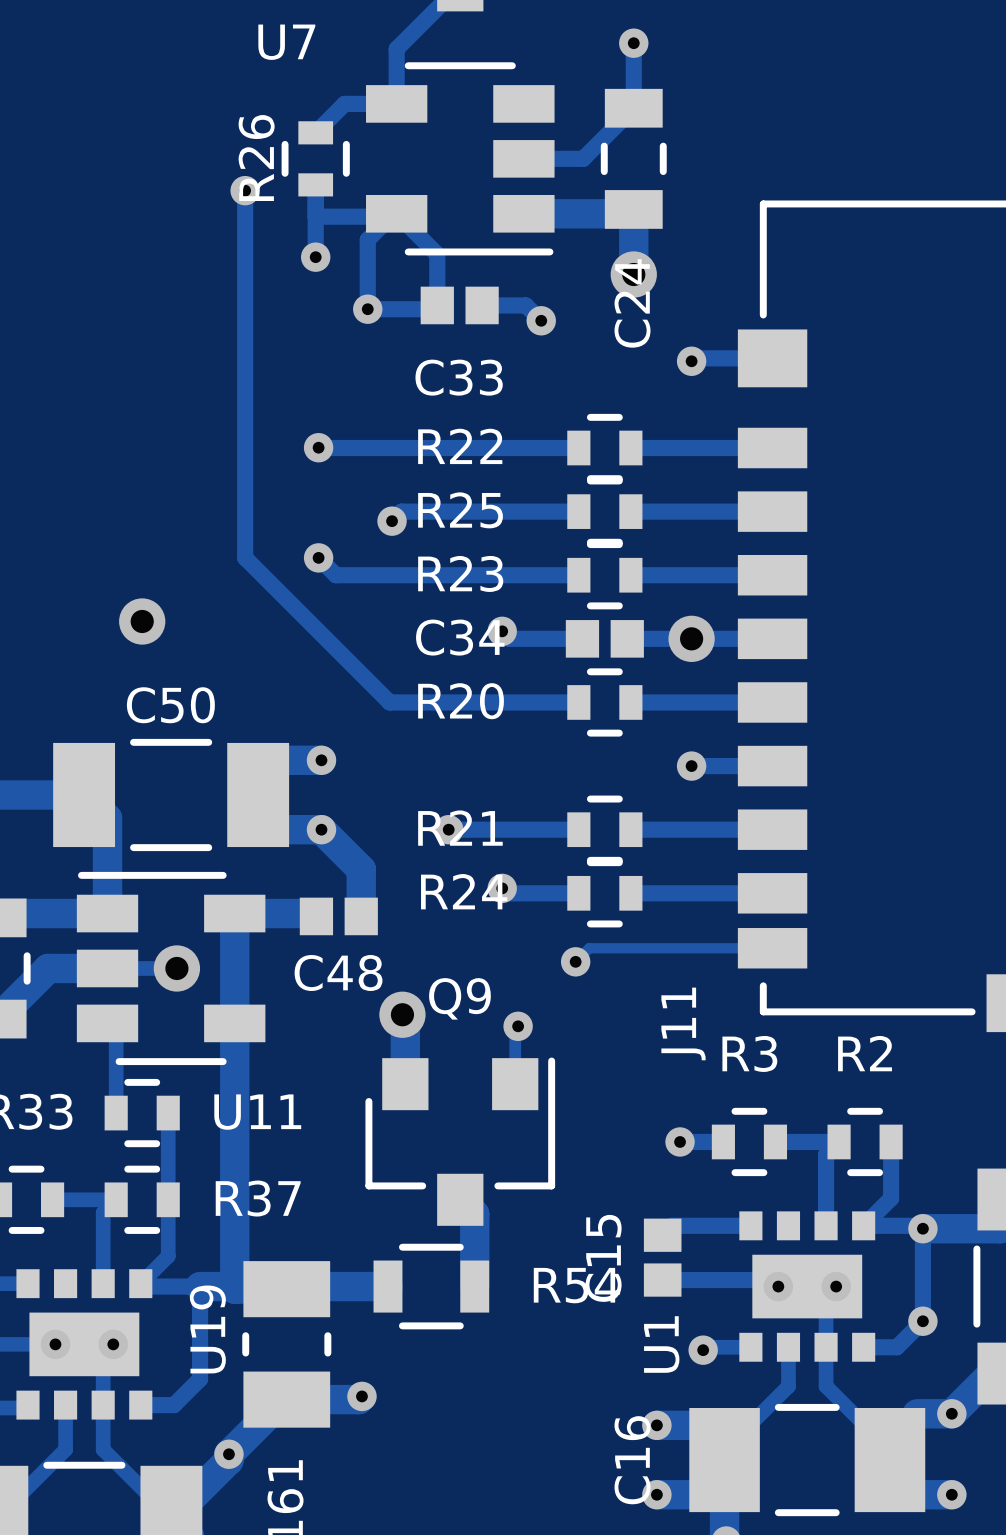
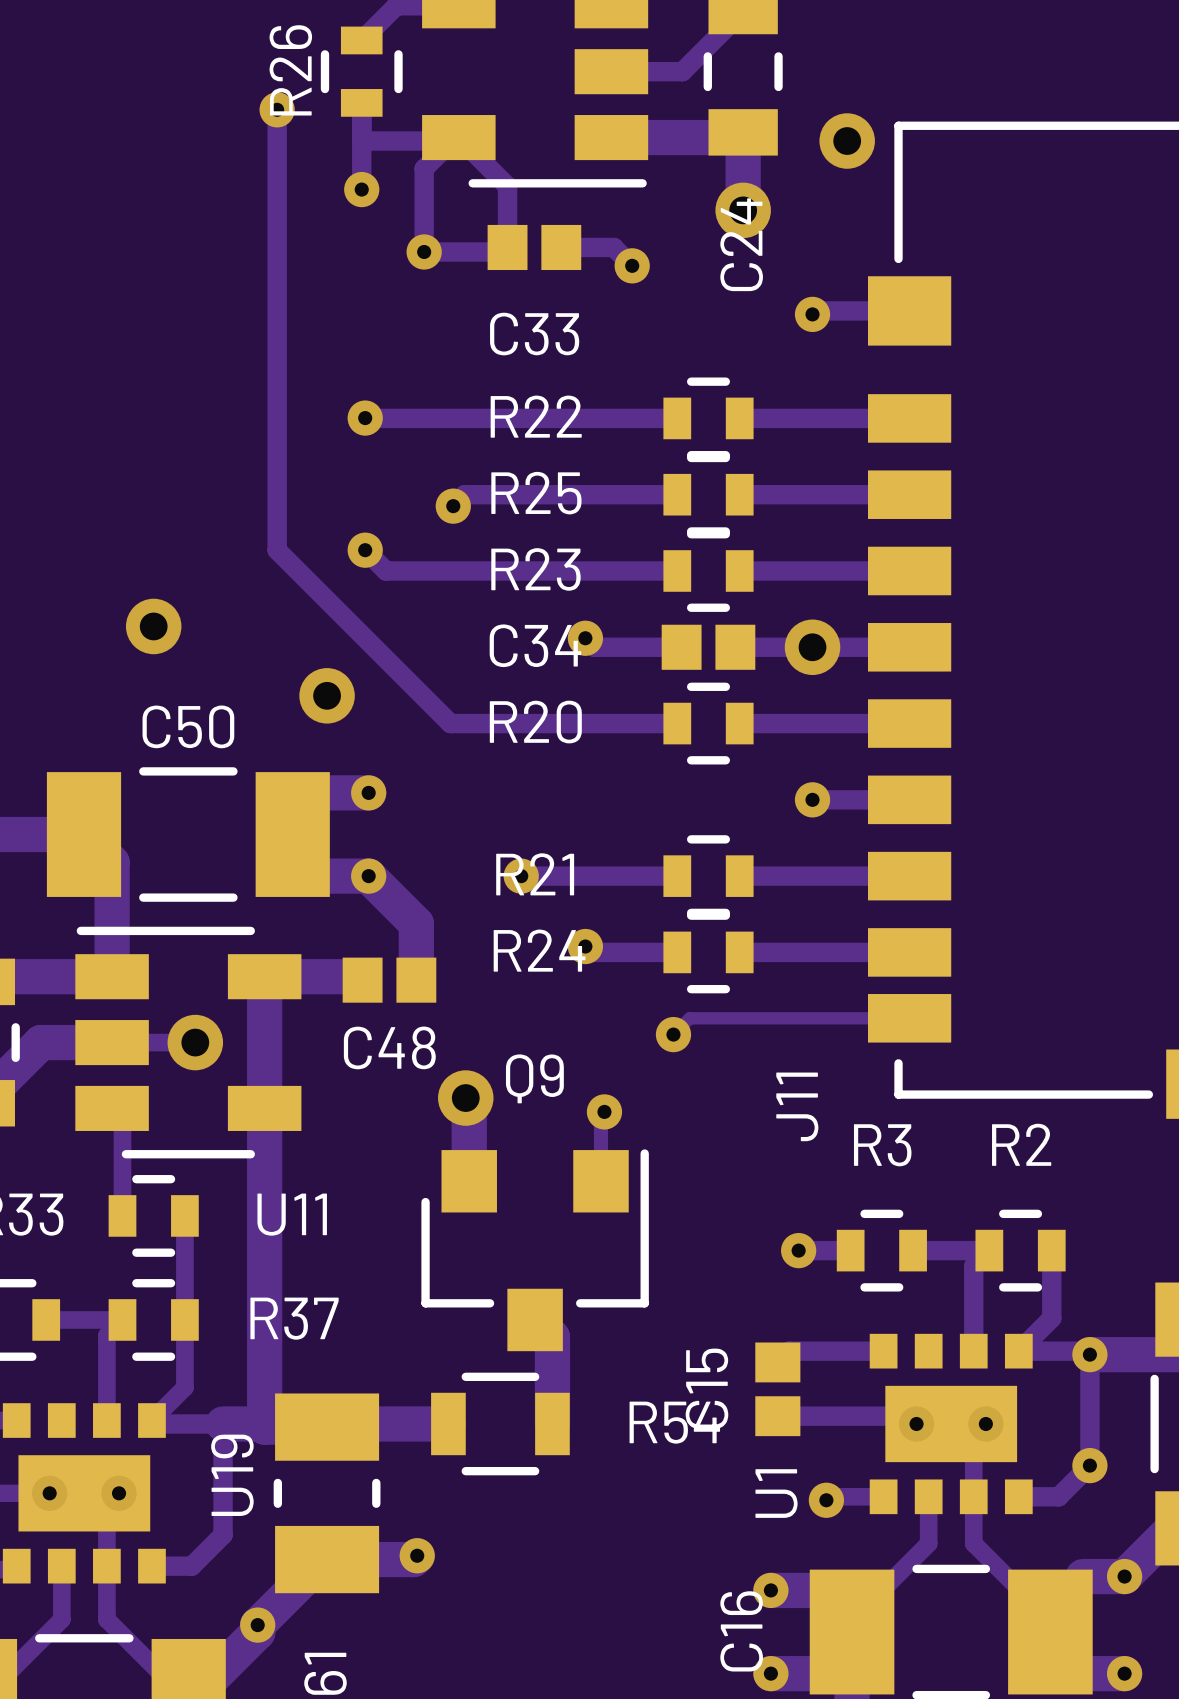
via: none -> (847, 141)
via: none -> (327, 695)

